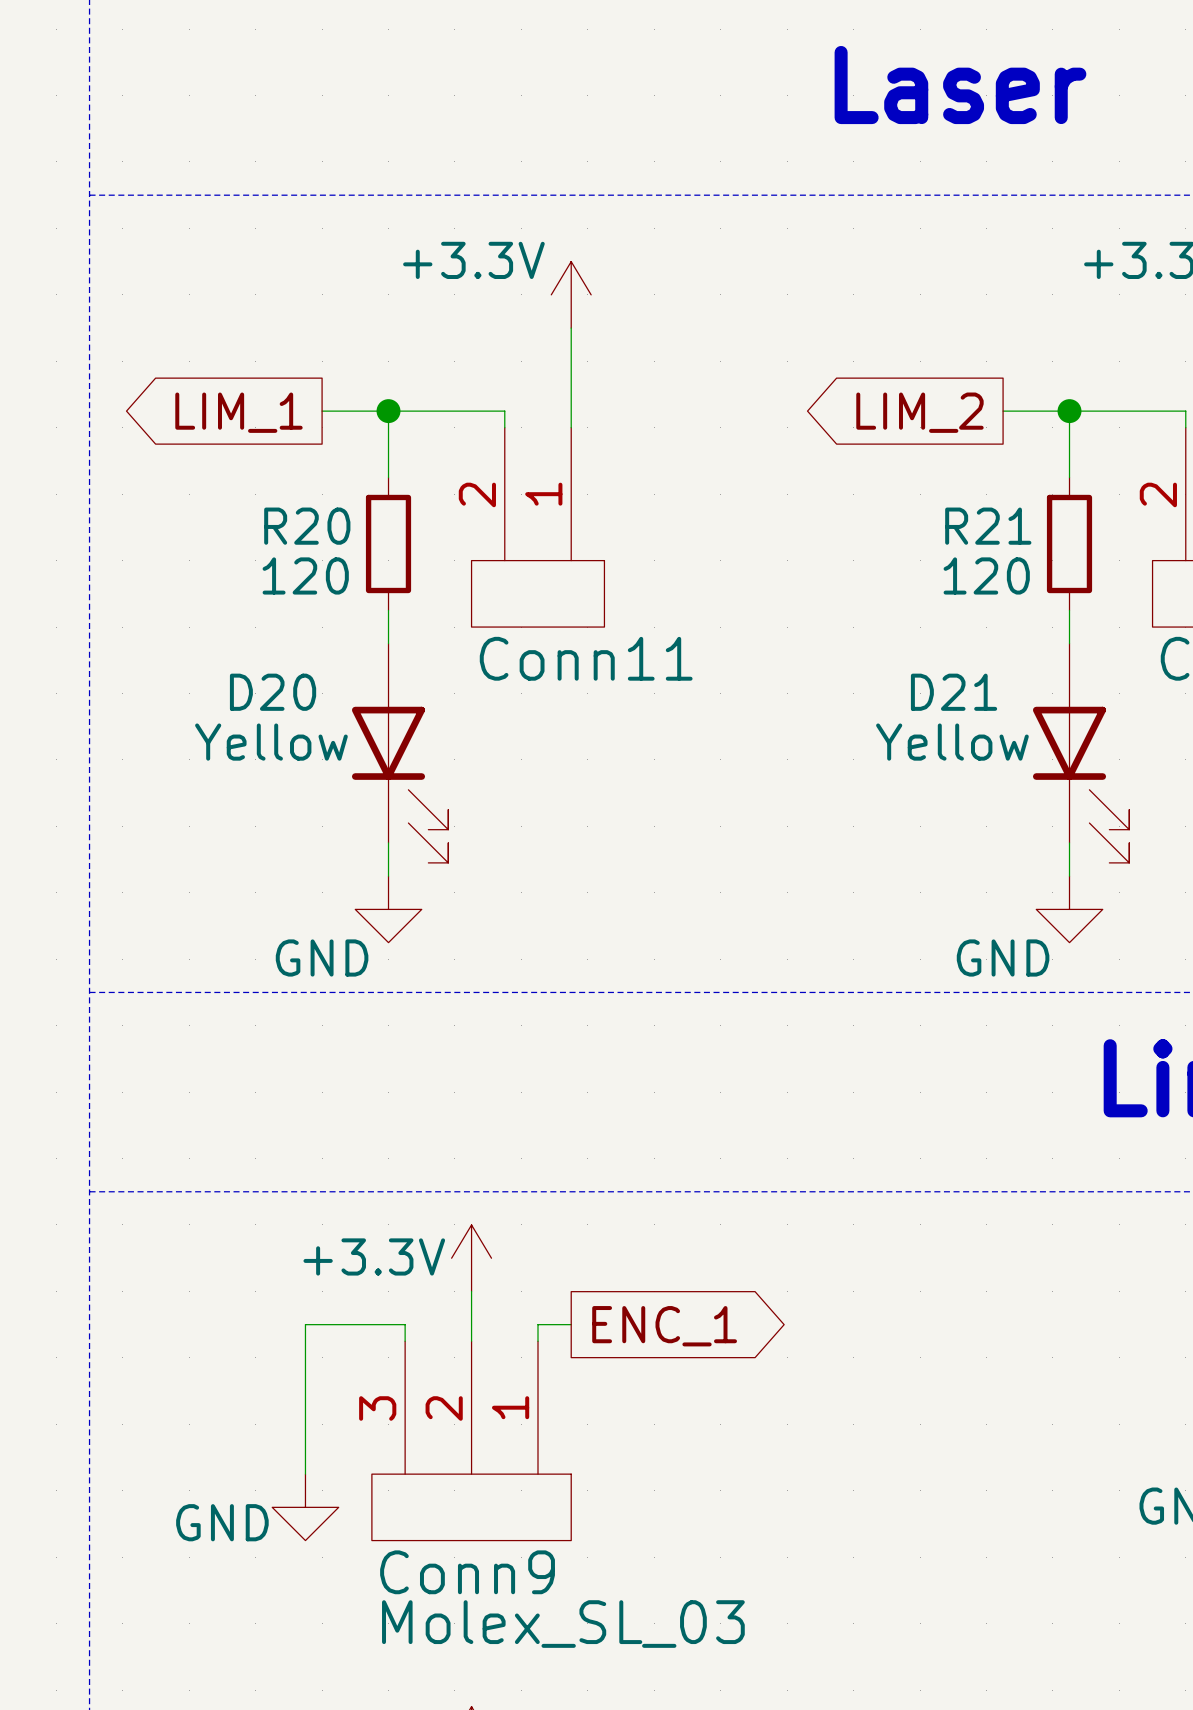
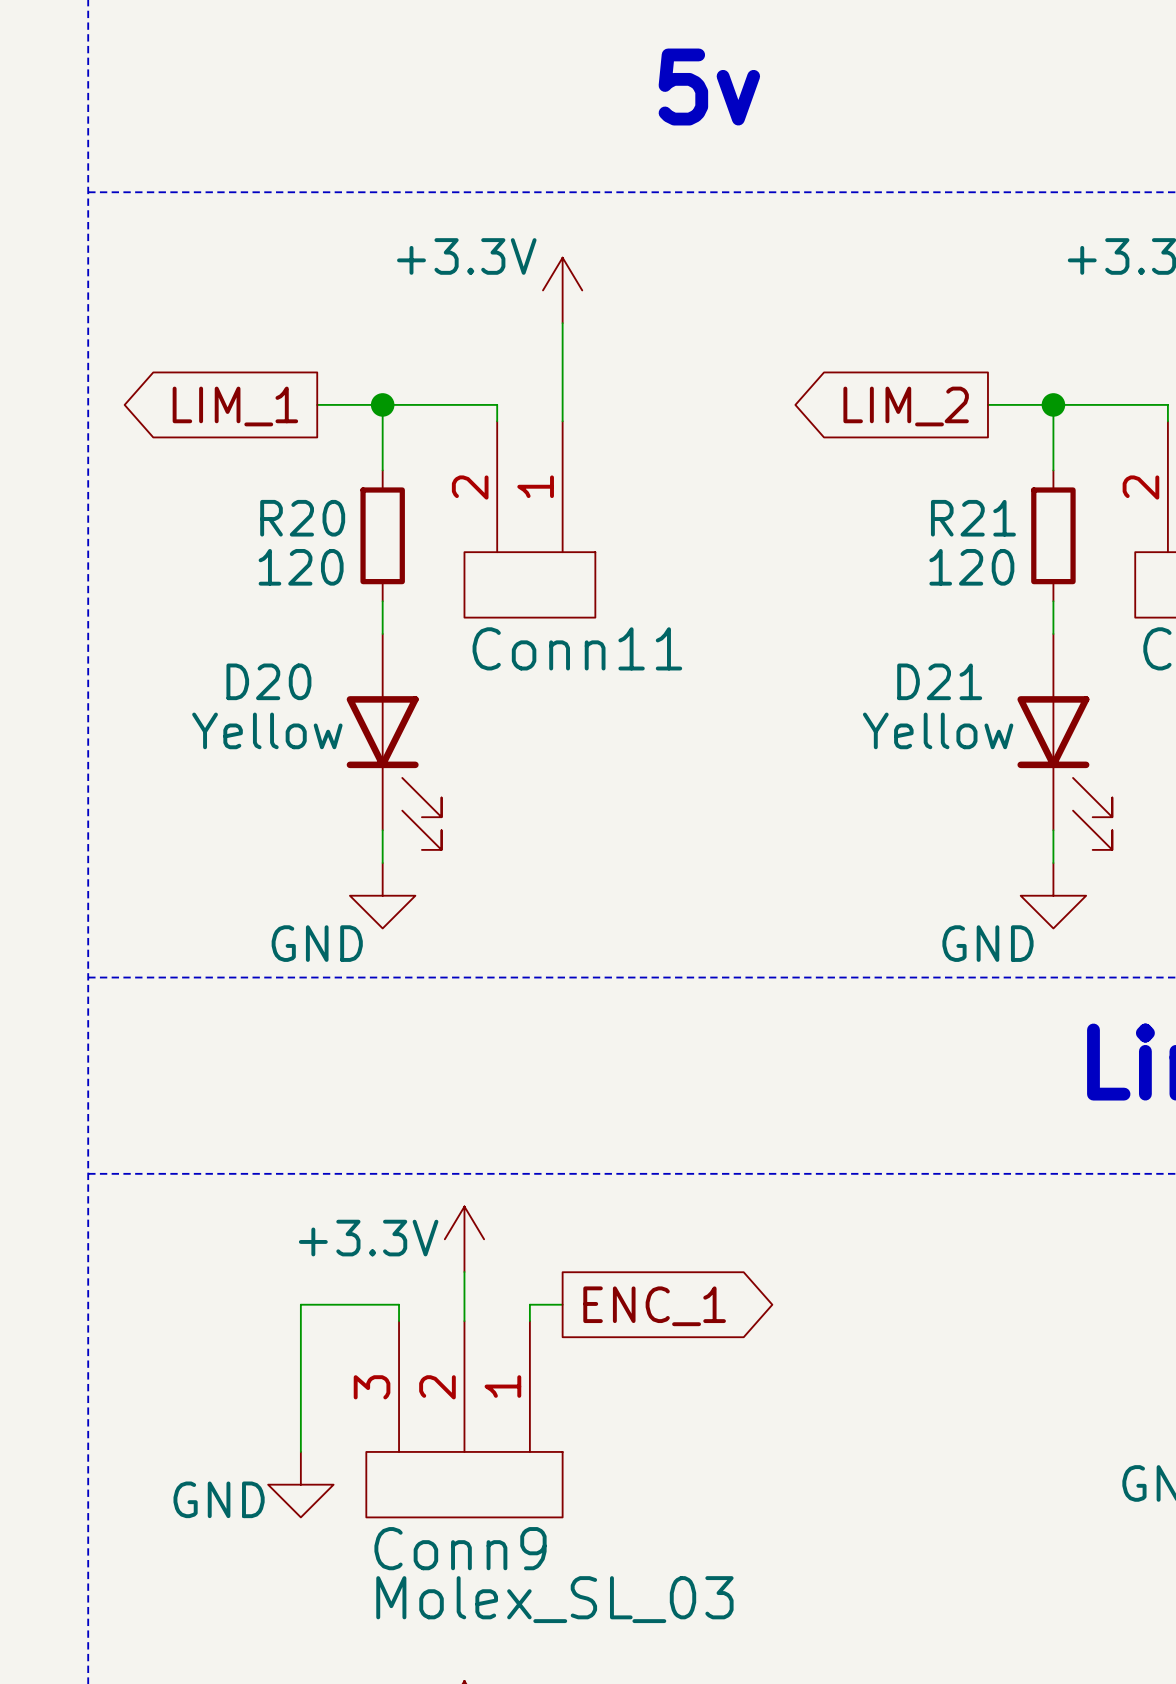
text: Laser (960, 85) -> none
text: none -> 5v (709, 87)

